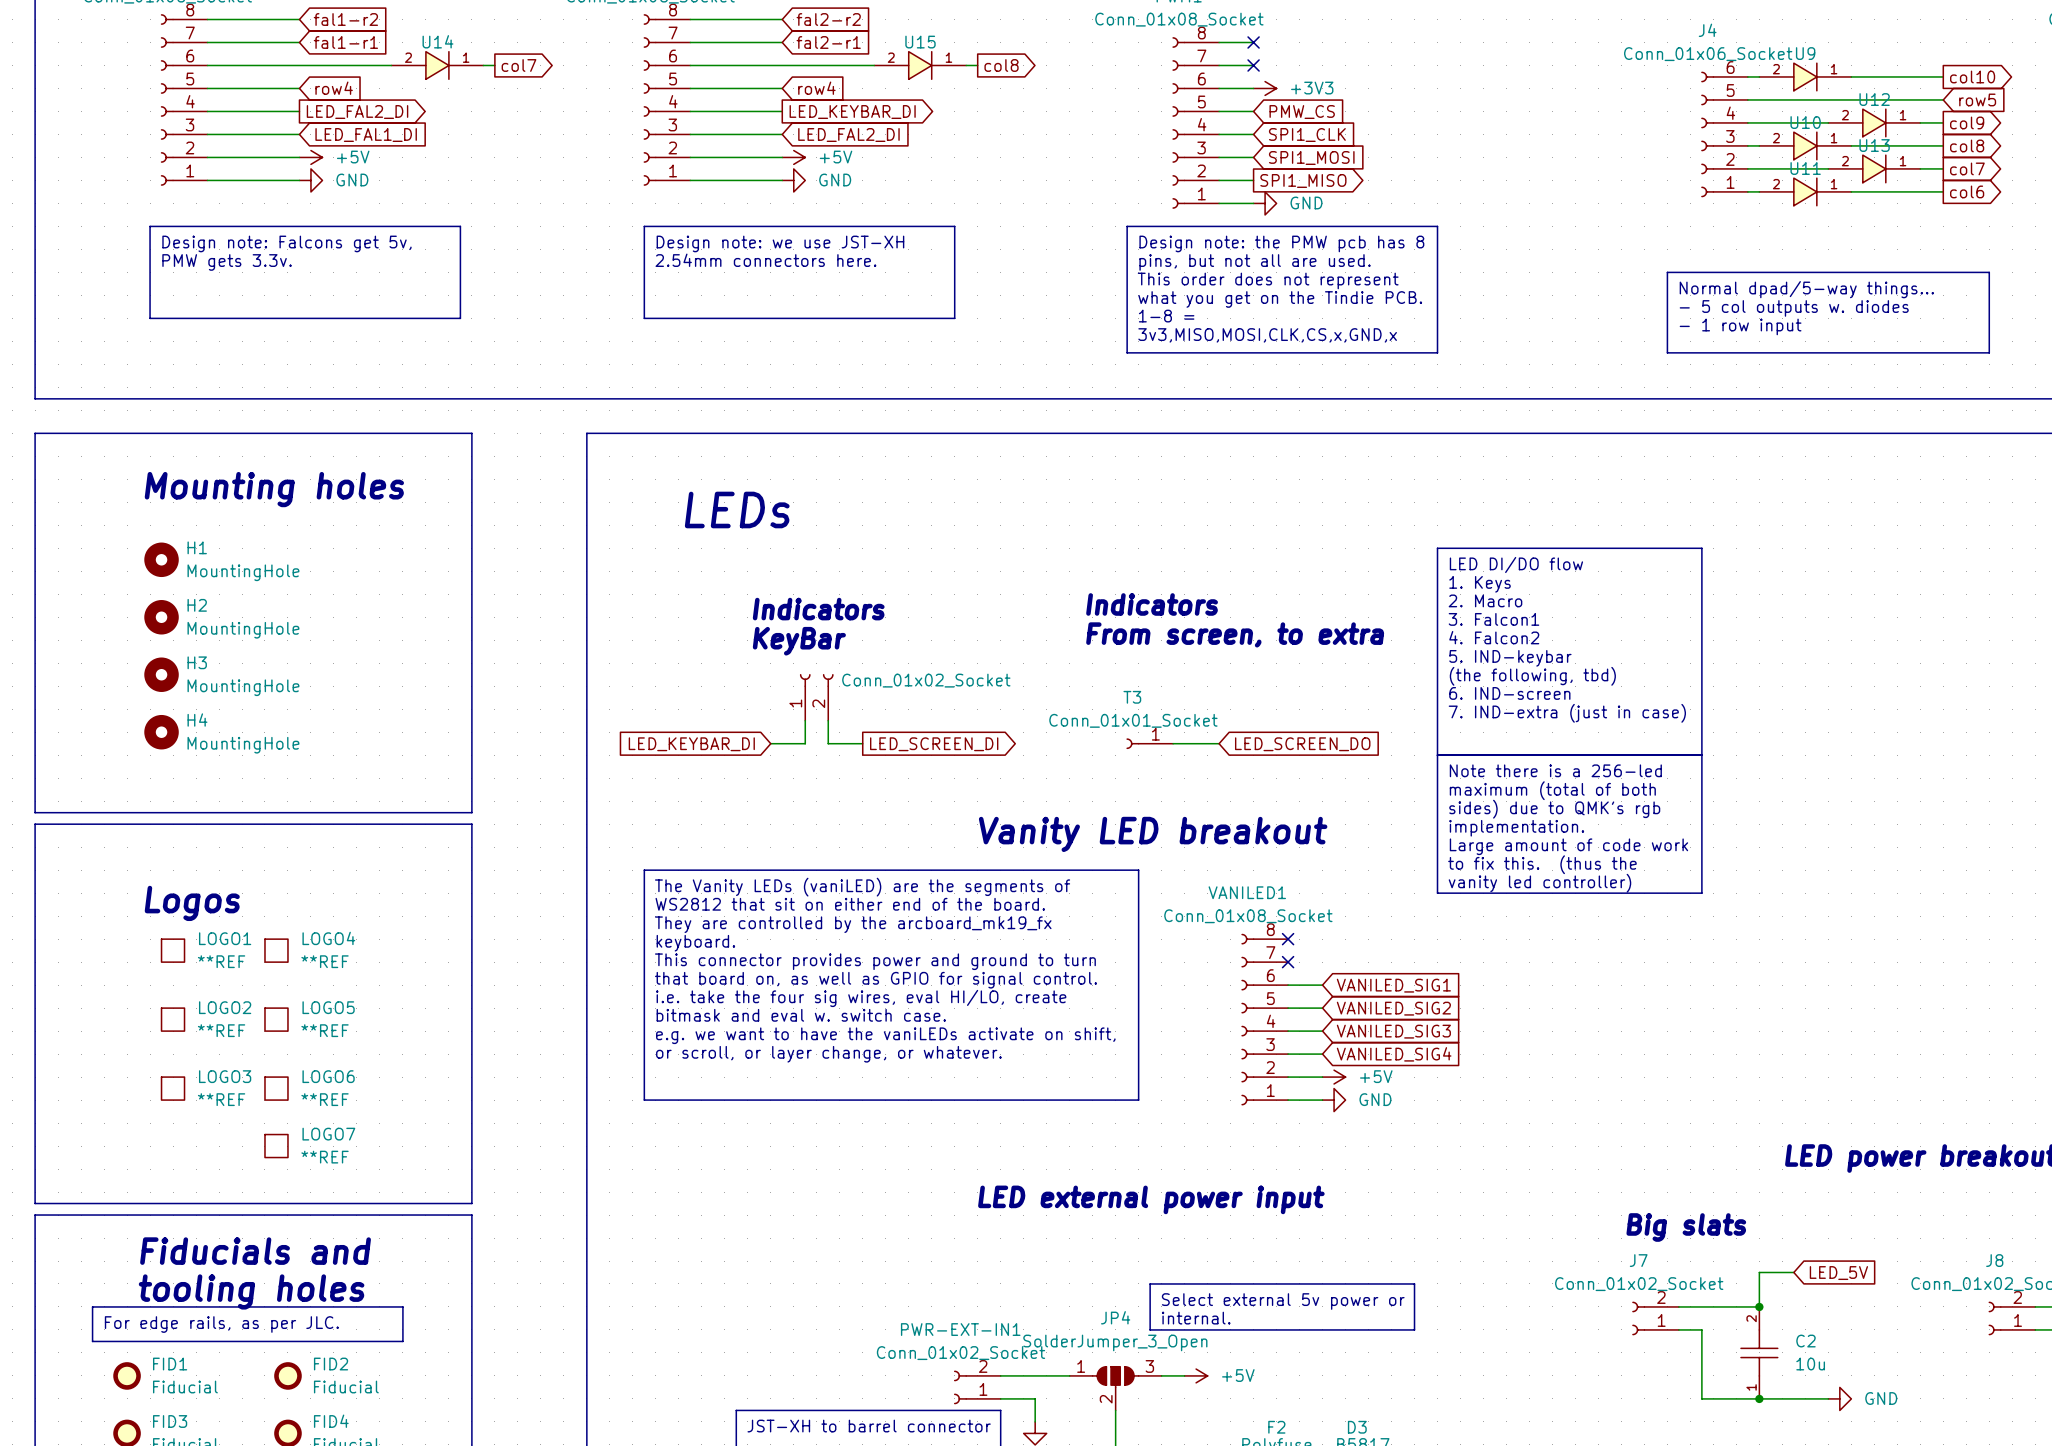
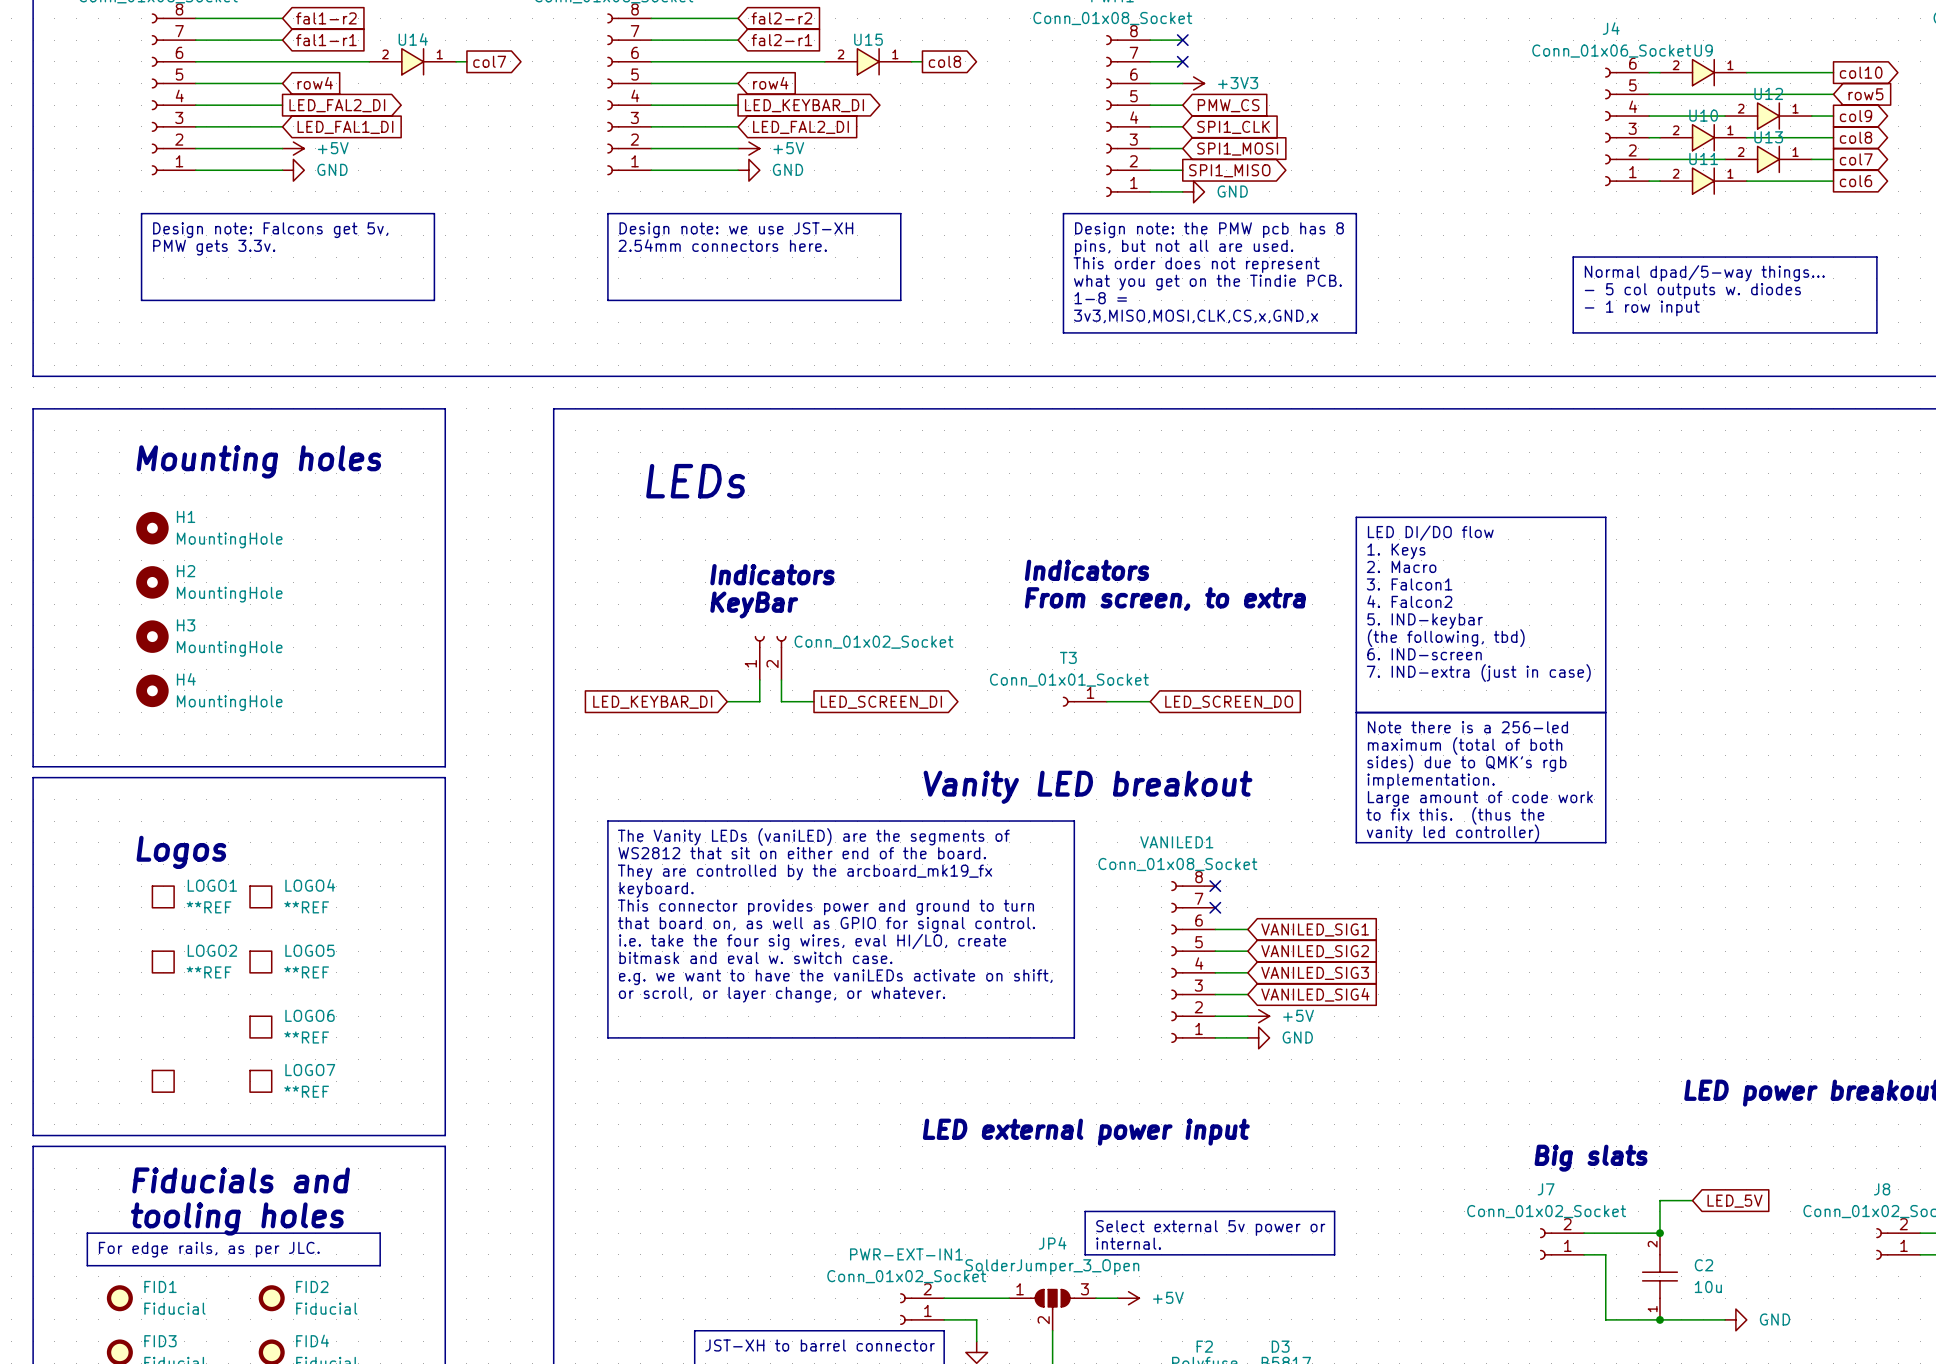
LOGO3: **REF (173, 1088) -> none
part: none -> (163, 1081)

